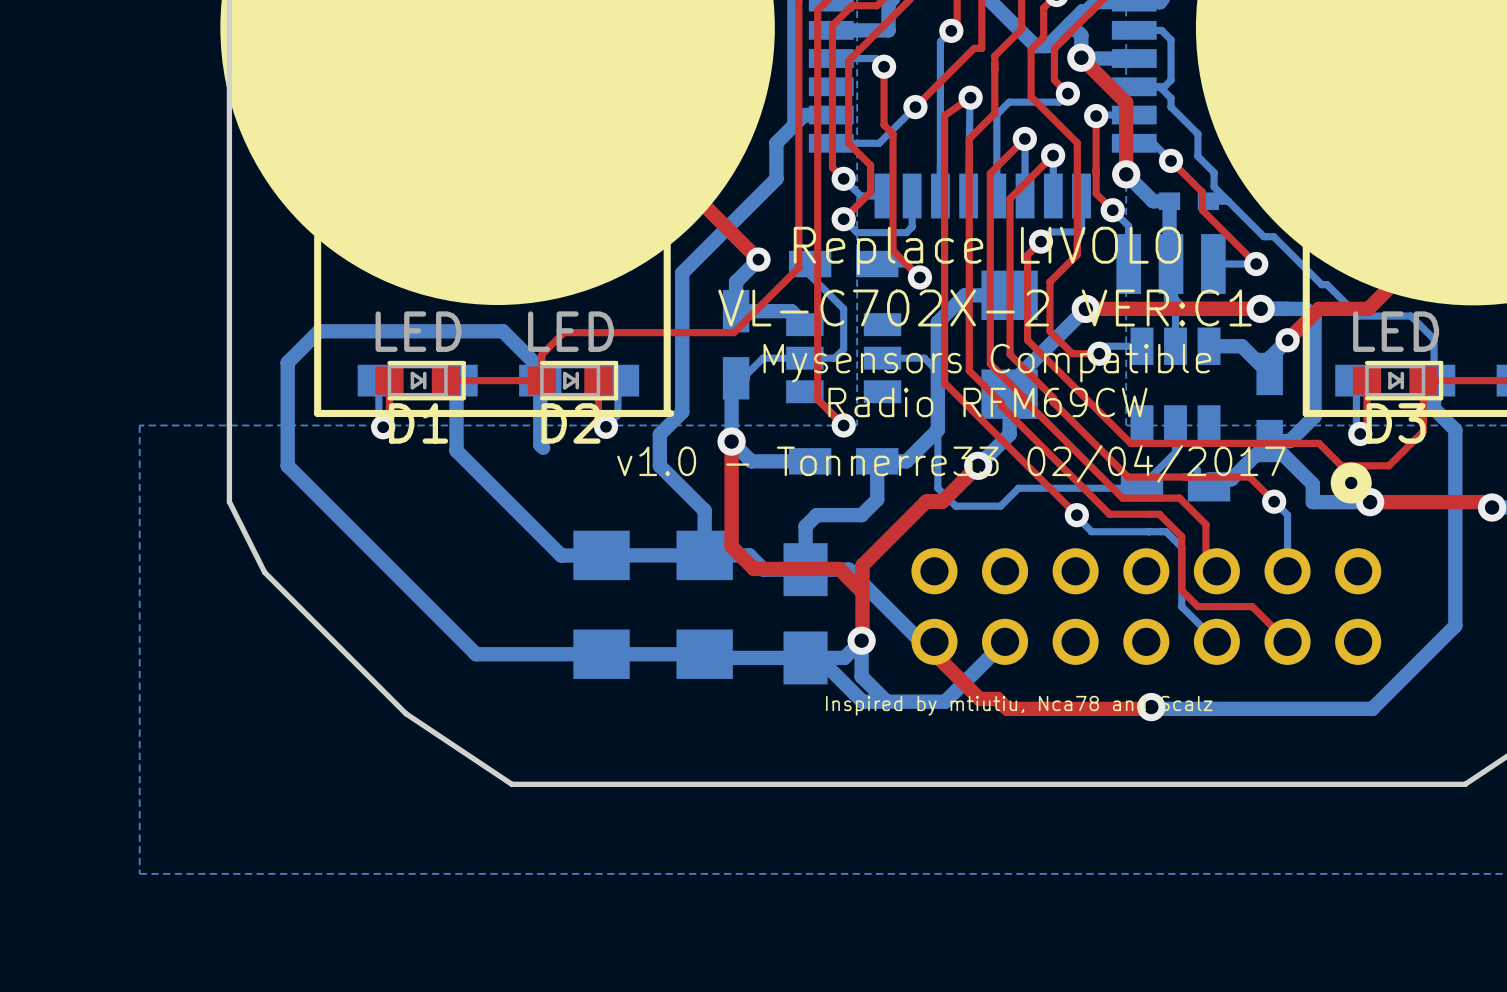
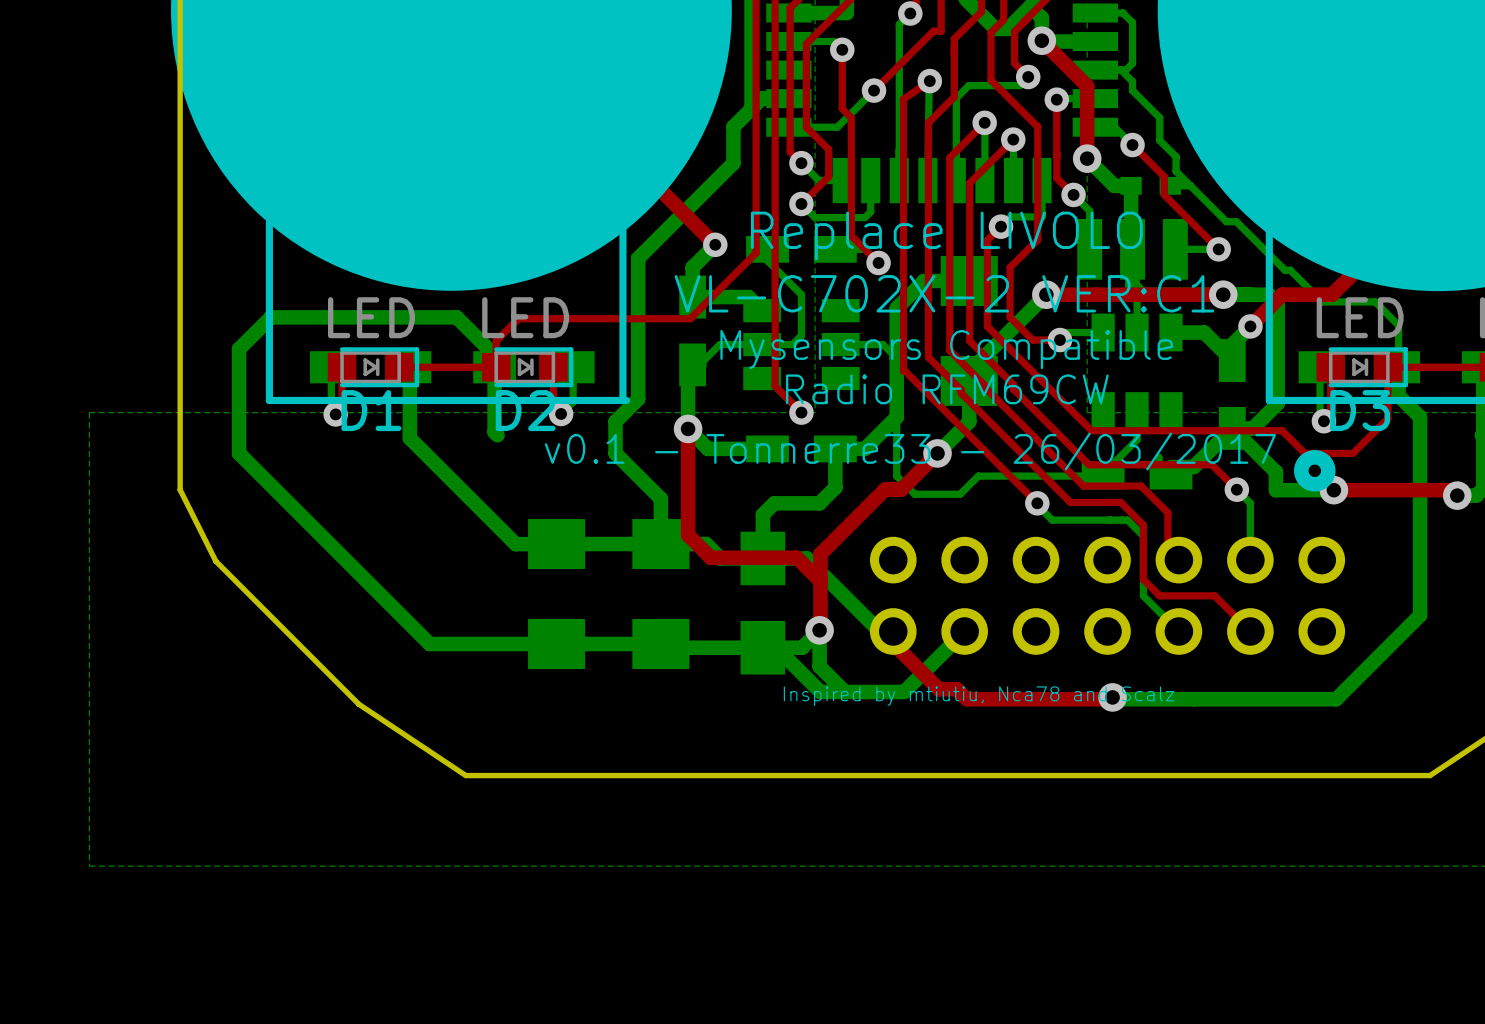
text: v1.0 - Tonnerre33 02/04/2017 (951, 463) -> v0.1 - Tonnerre33 - 26/03/2017 (910, 451)

